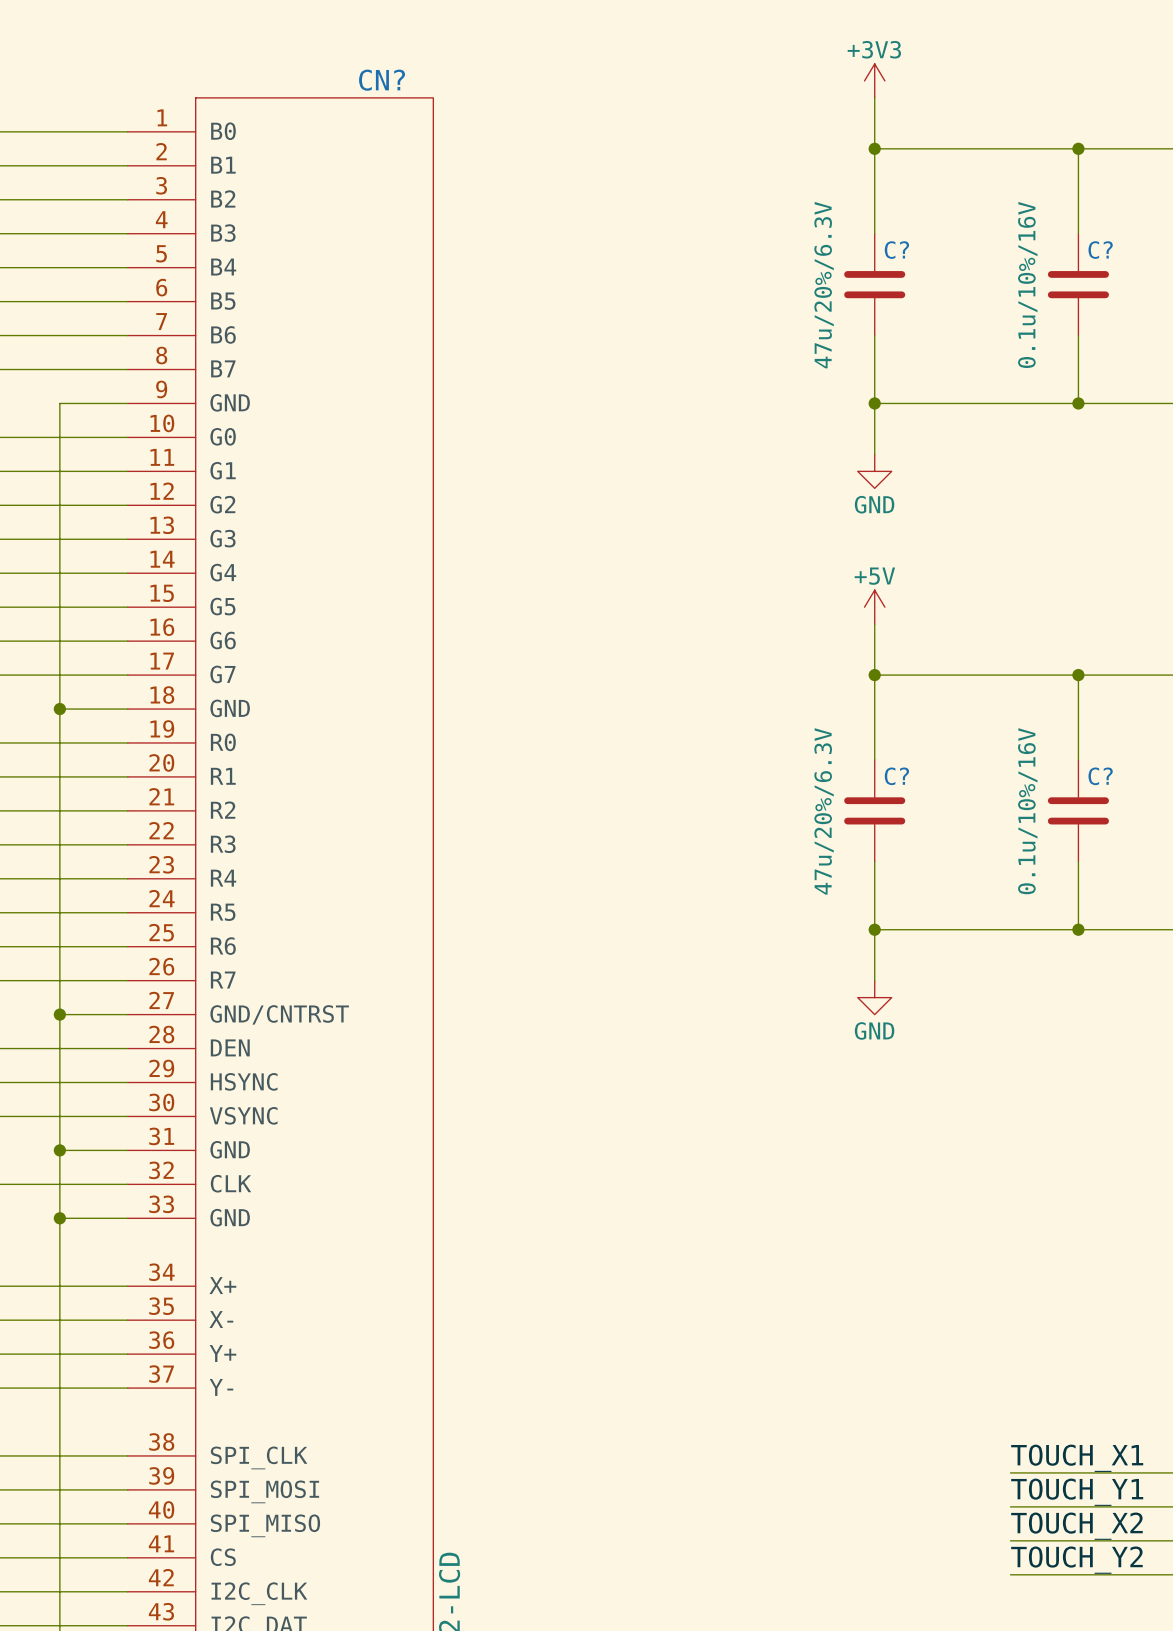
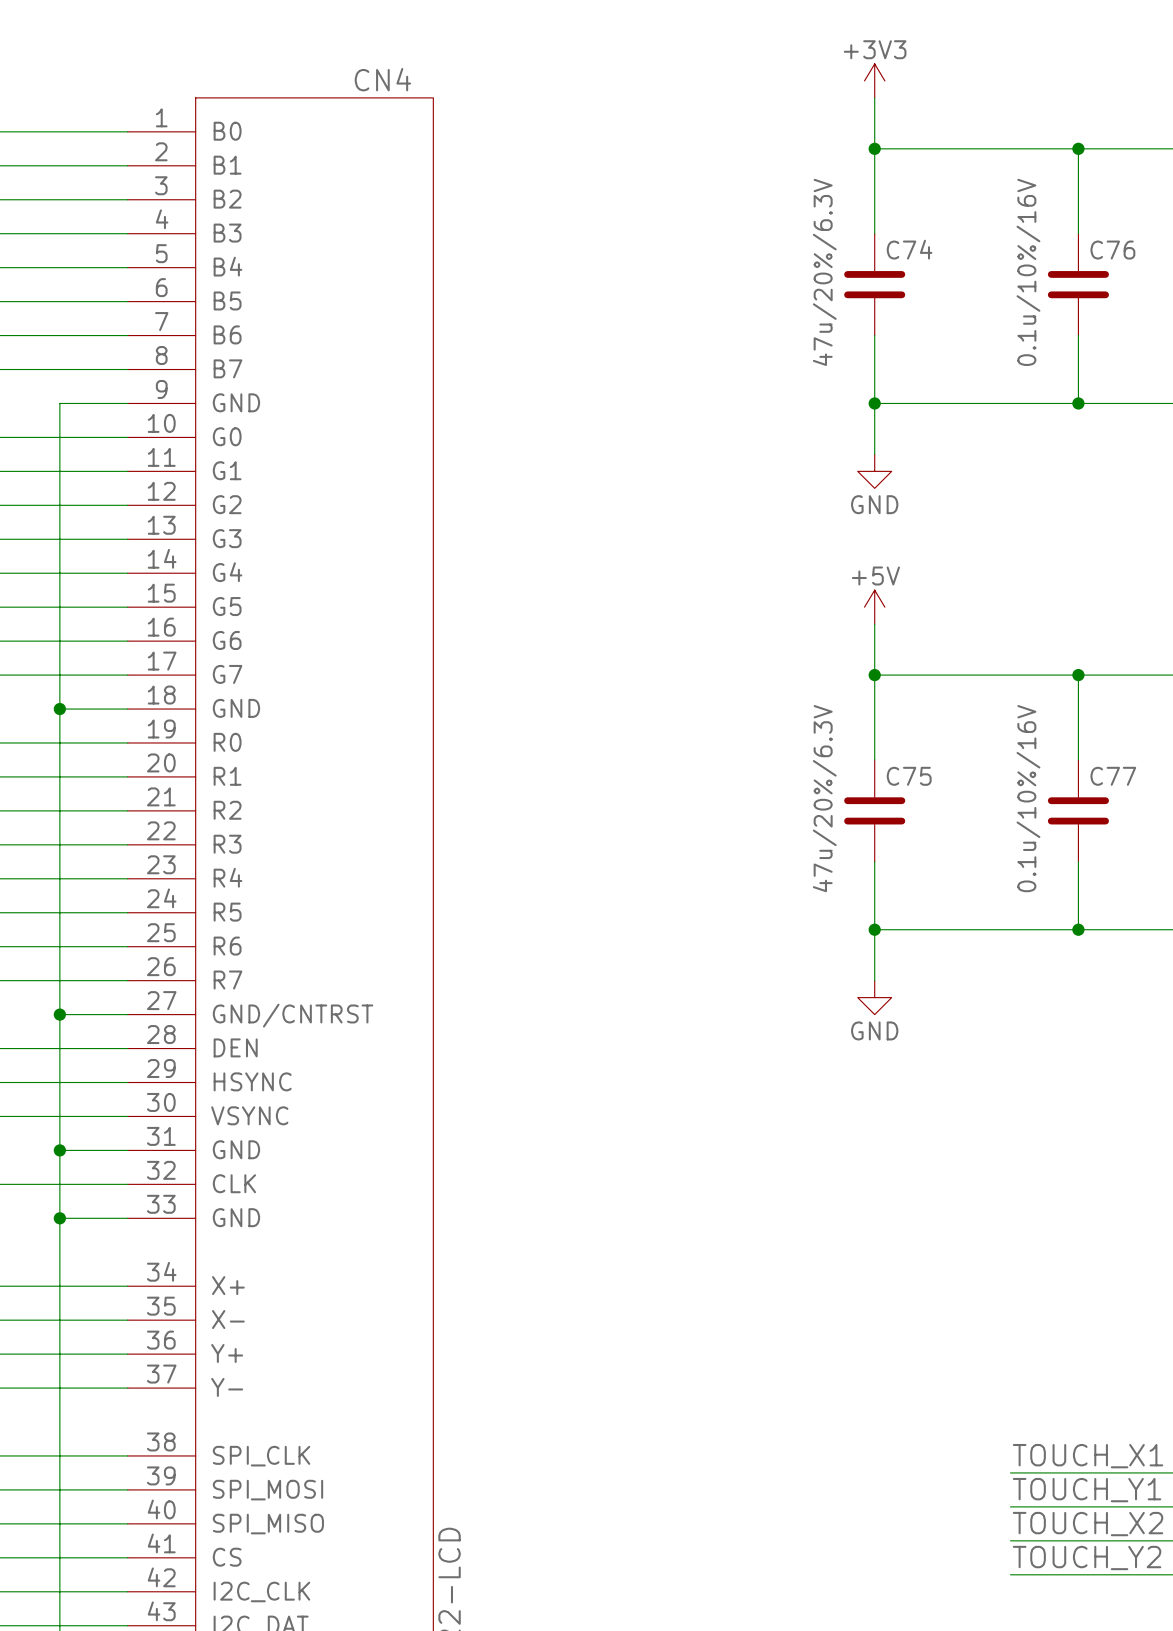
CN? name: CN? (382, 80) -> CN4 (382, 79)
C? name: C? (896, 250) -> C74 (909, 249)
C? name: C? (1100, 250) -> C76 (1112, 250)
C? name: C? (896, 776) -> C75 (909, 776)
C? name: C? (1100, 776) -> C77 (1113, 776)

